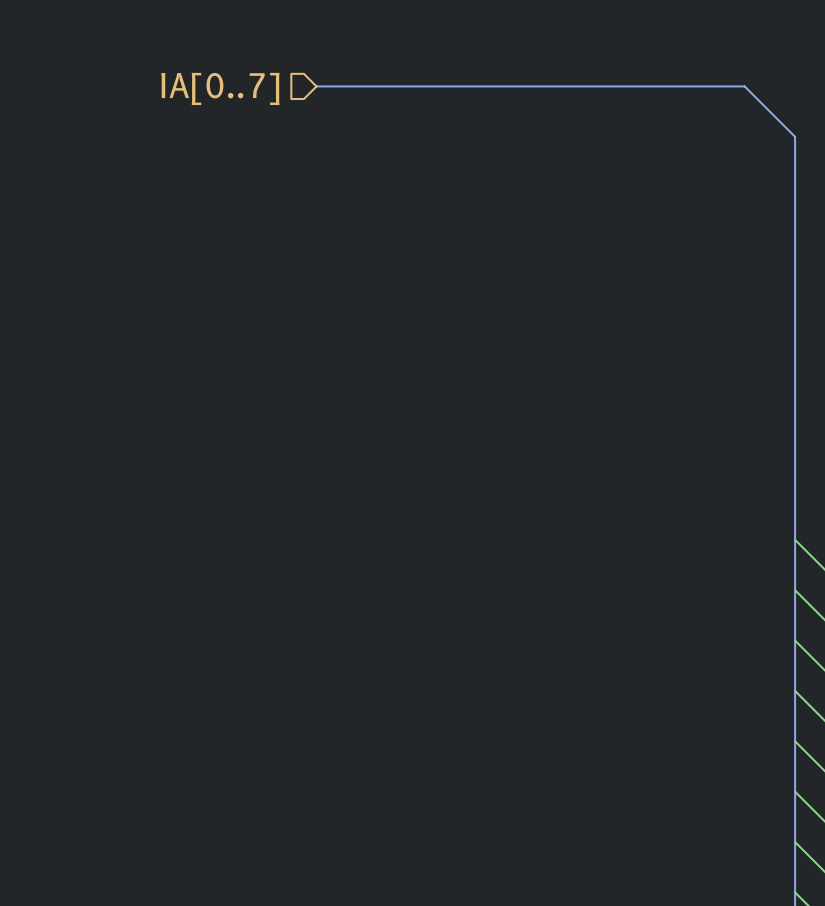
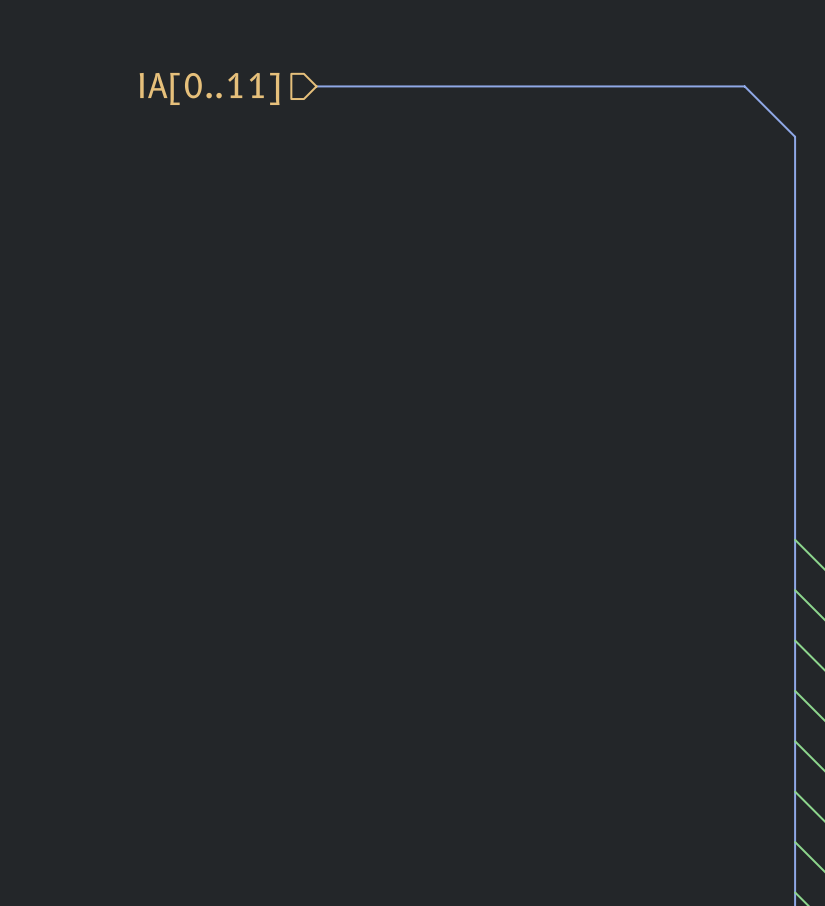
hierarchical label: IA[0..7] (220, 88) -> IA[0..11] (209, 88)

